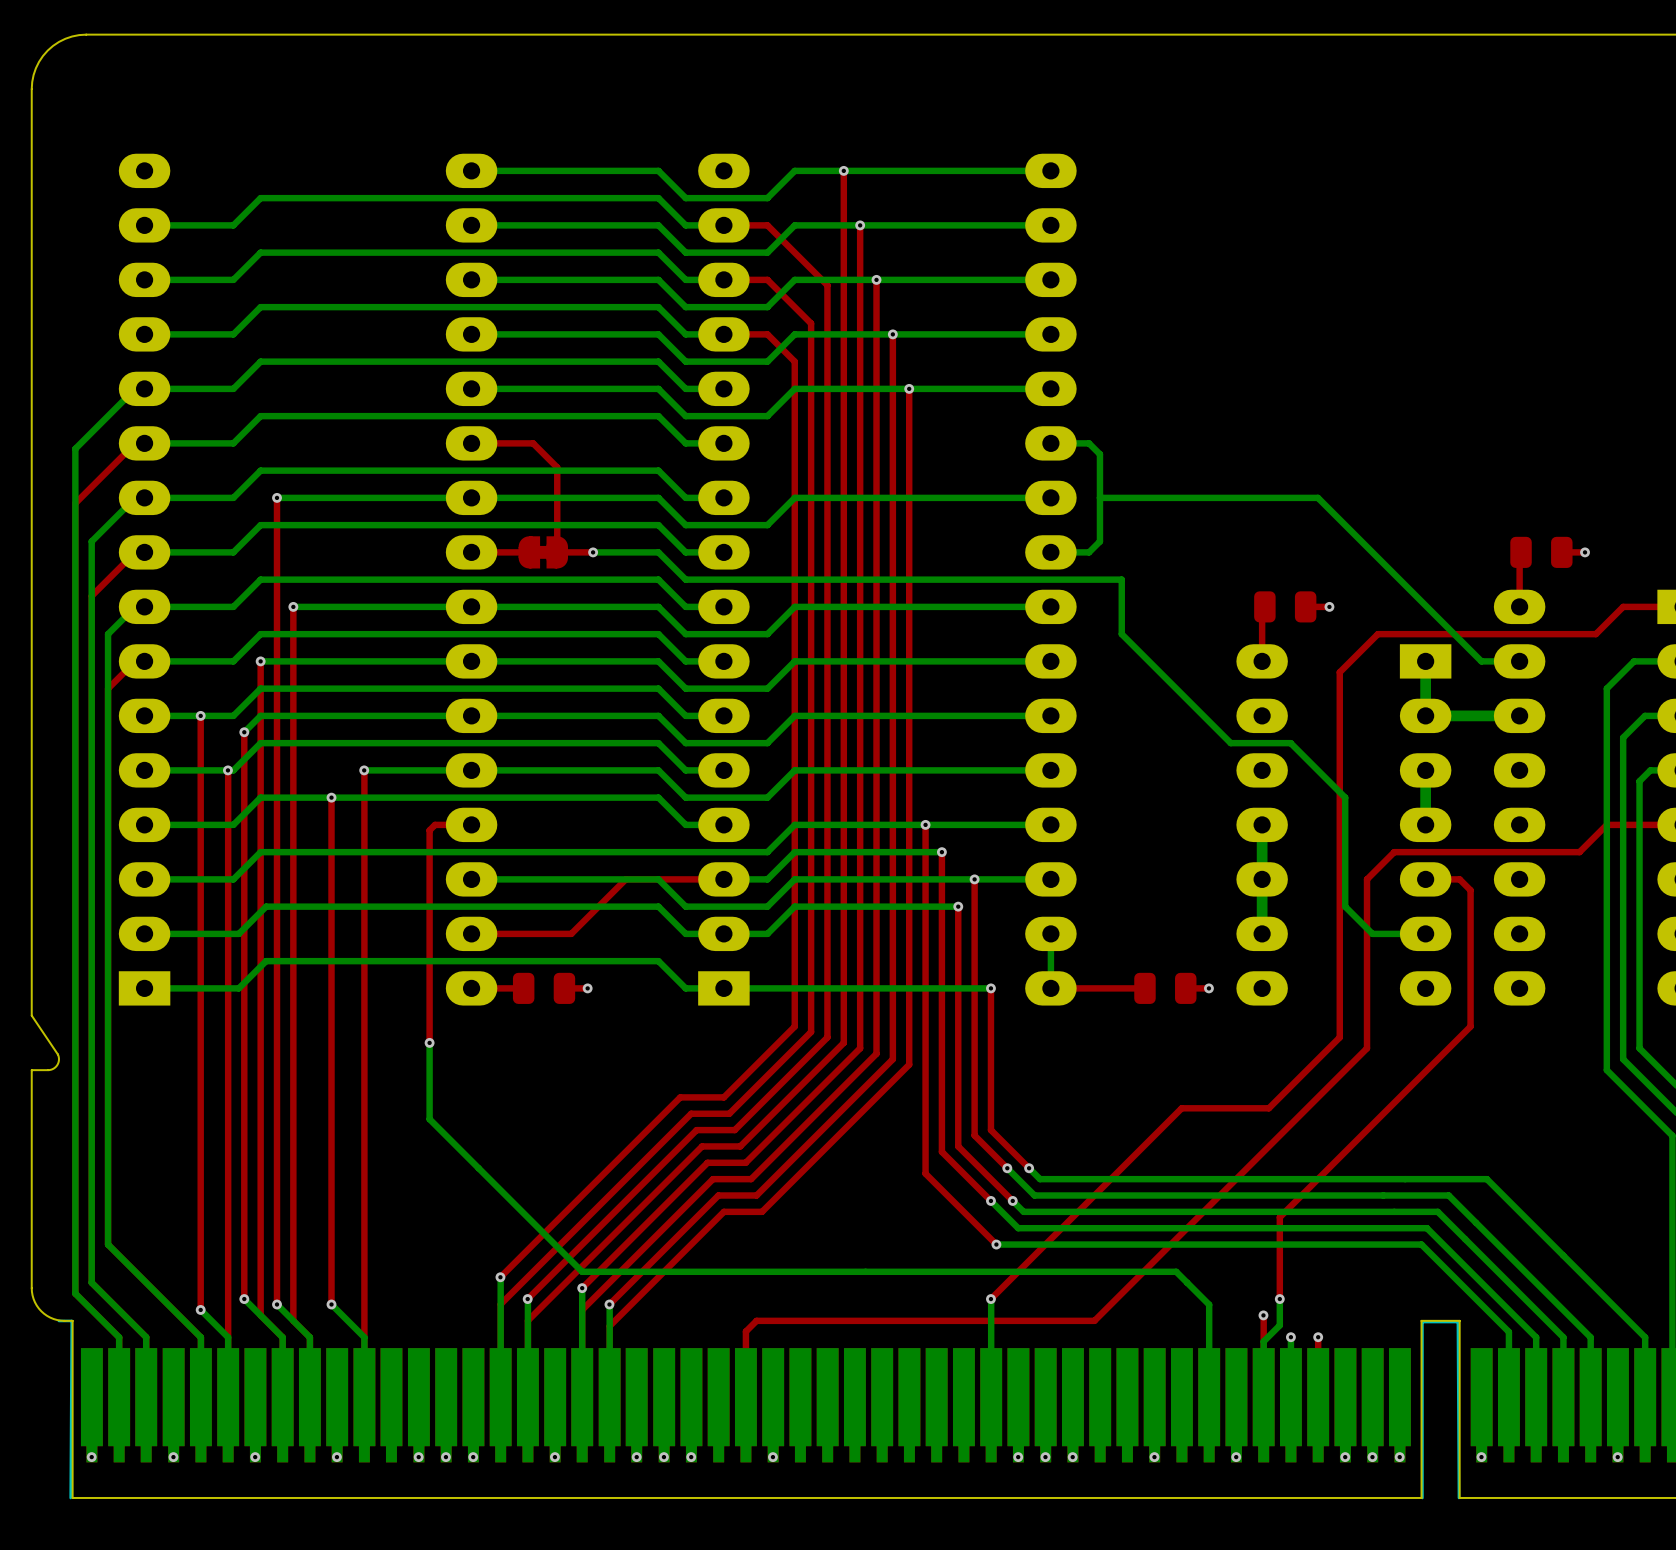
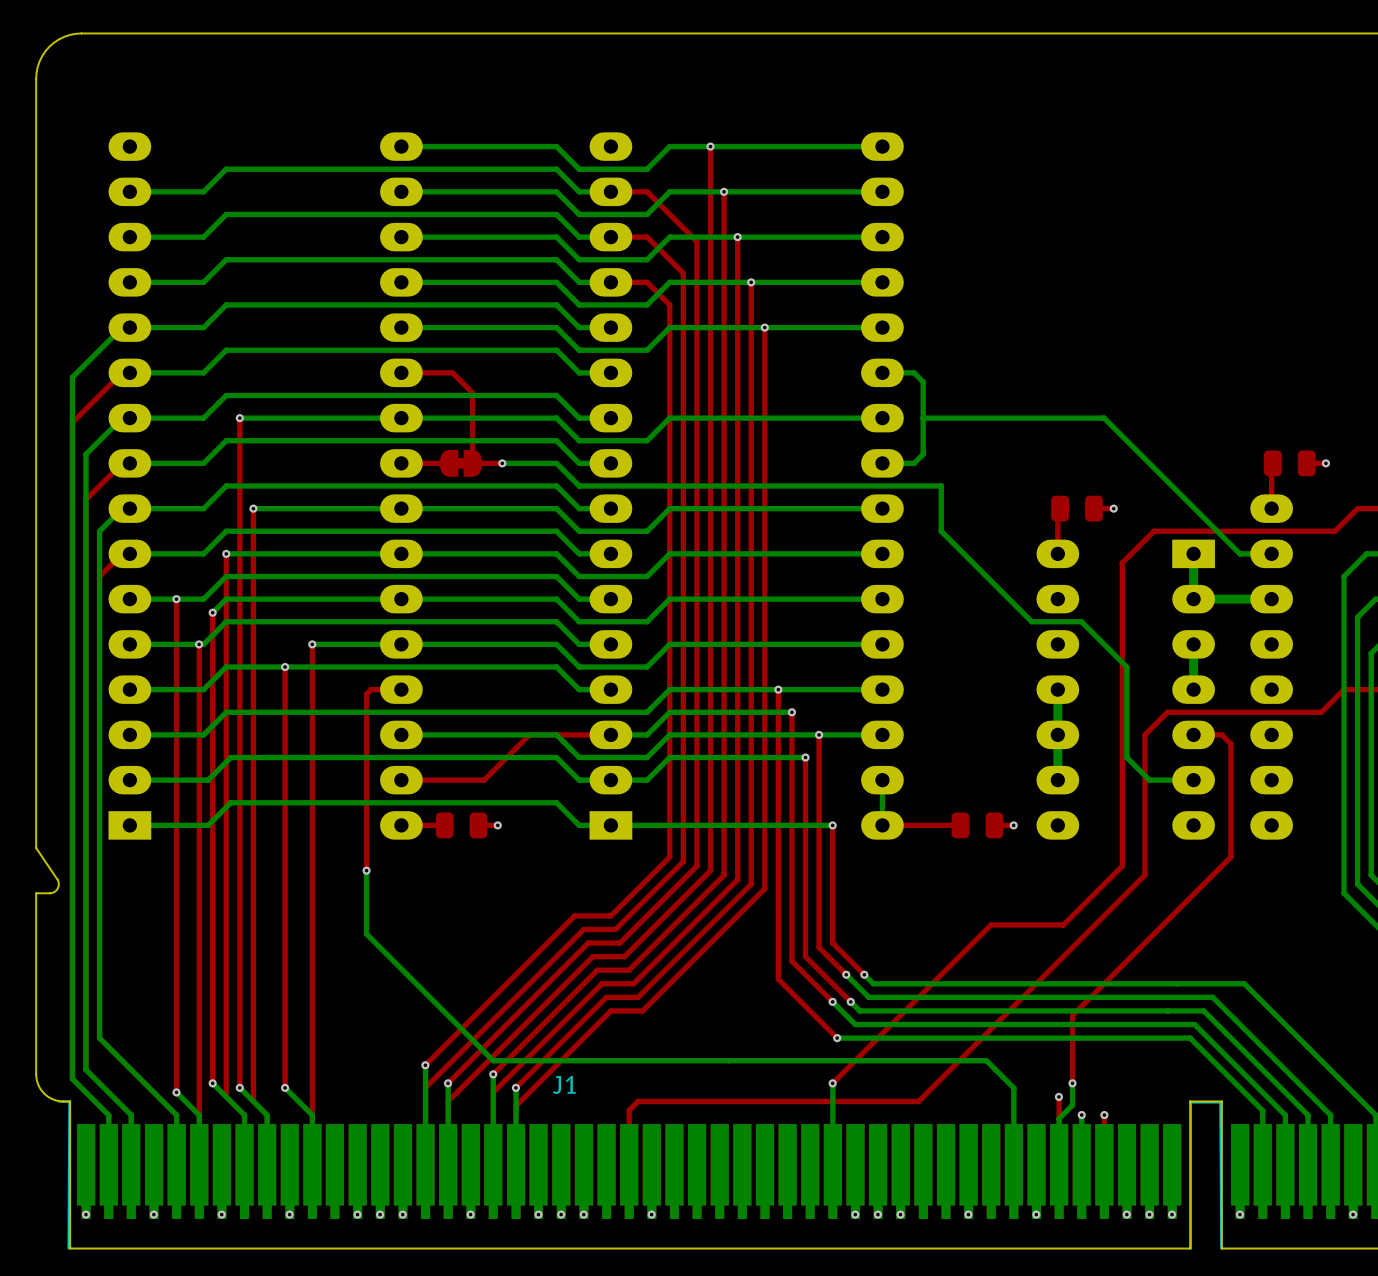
J1 name: none -> J1 (564, 1084)

